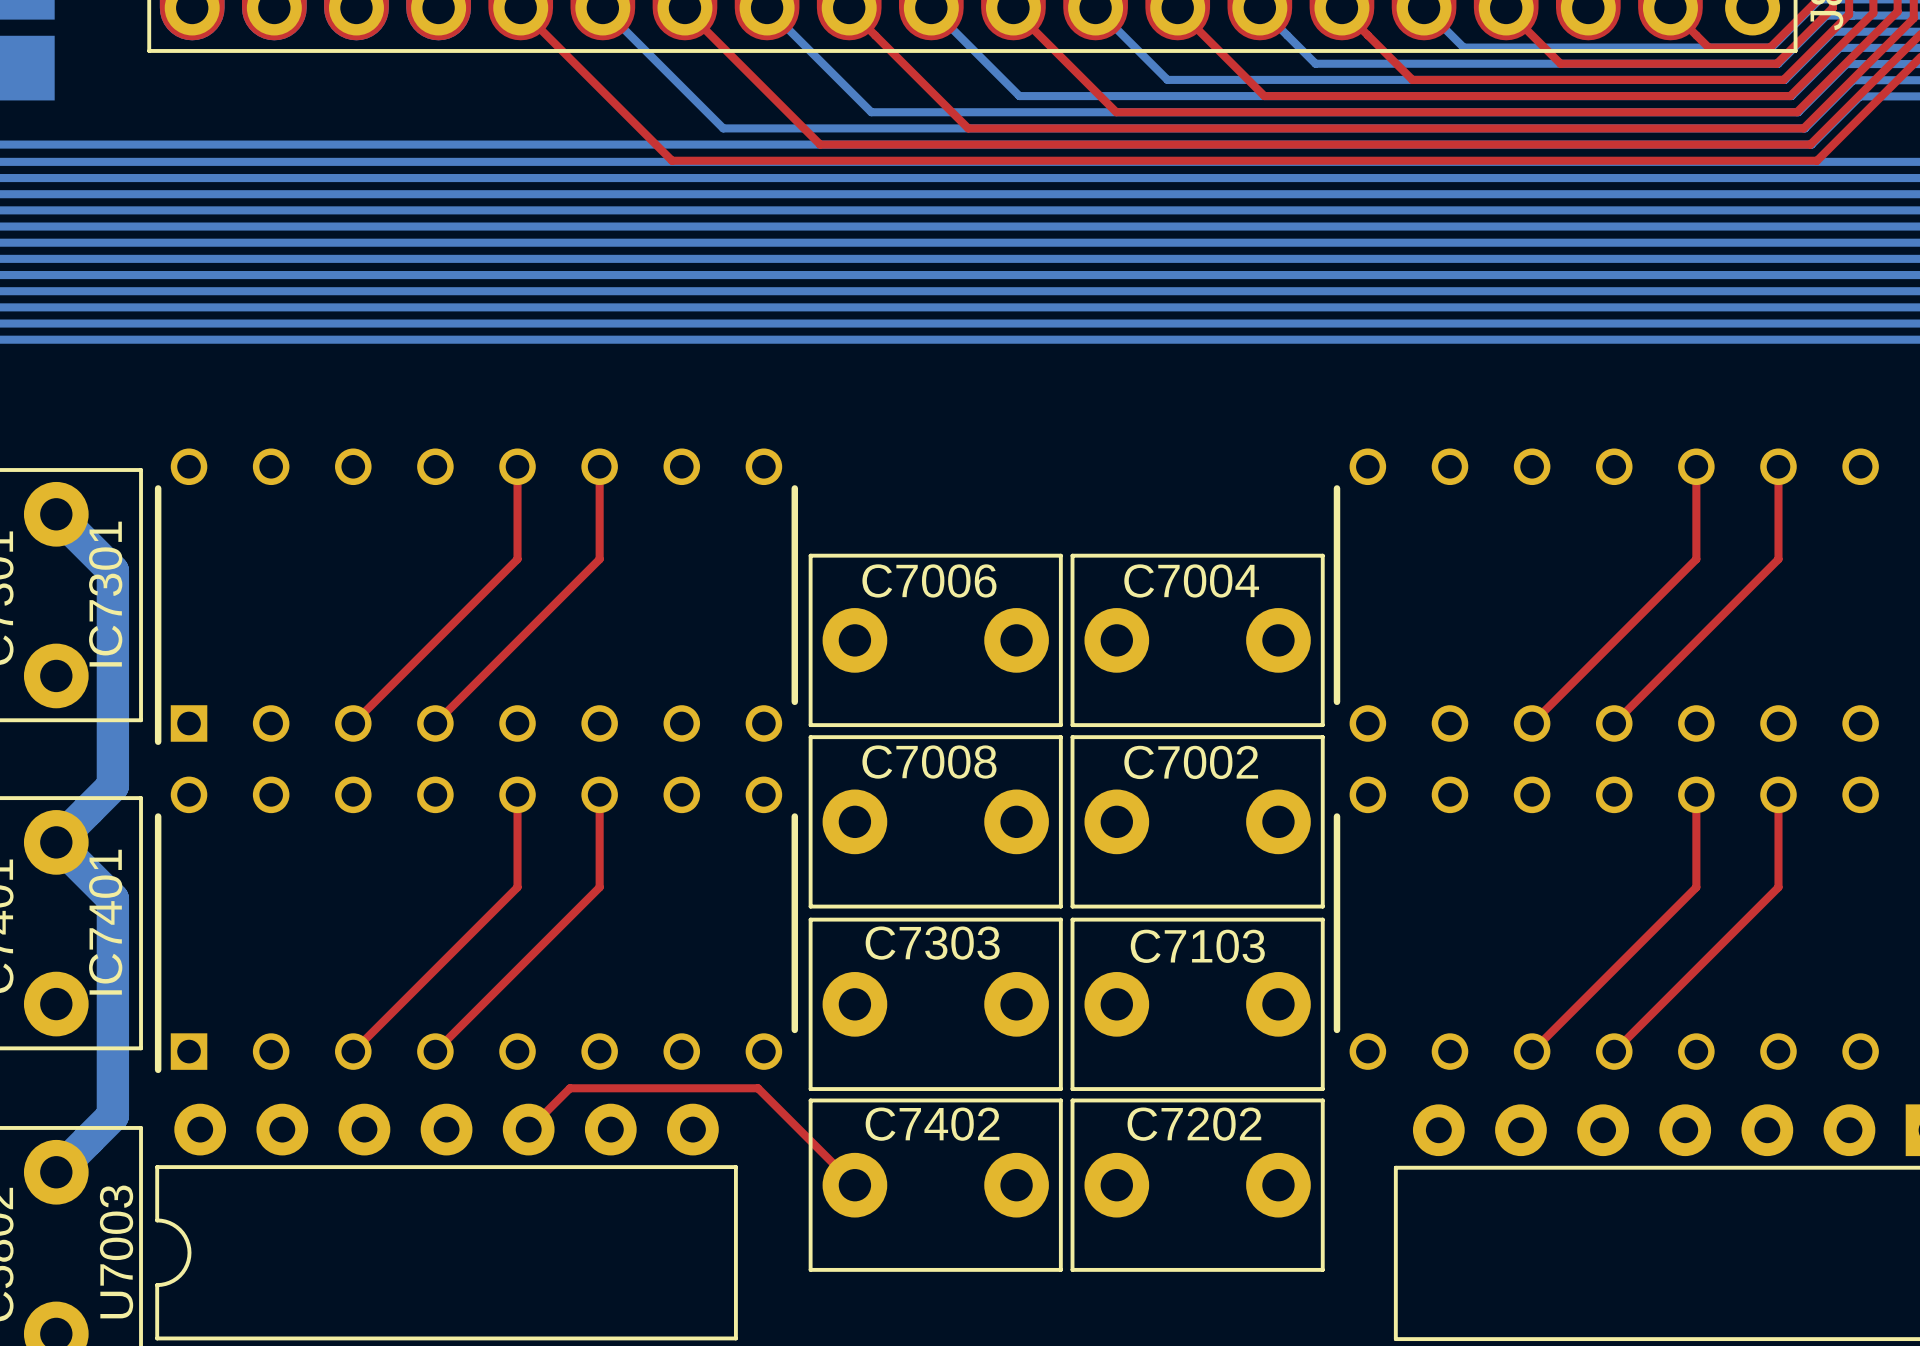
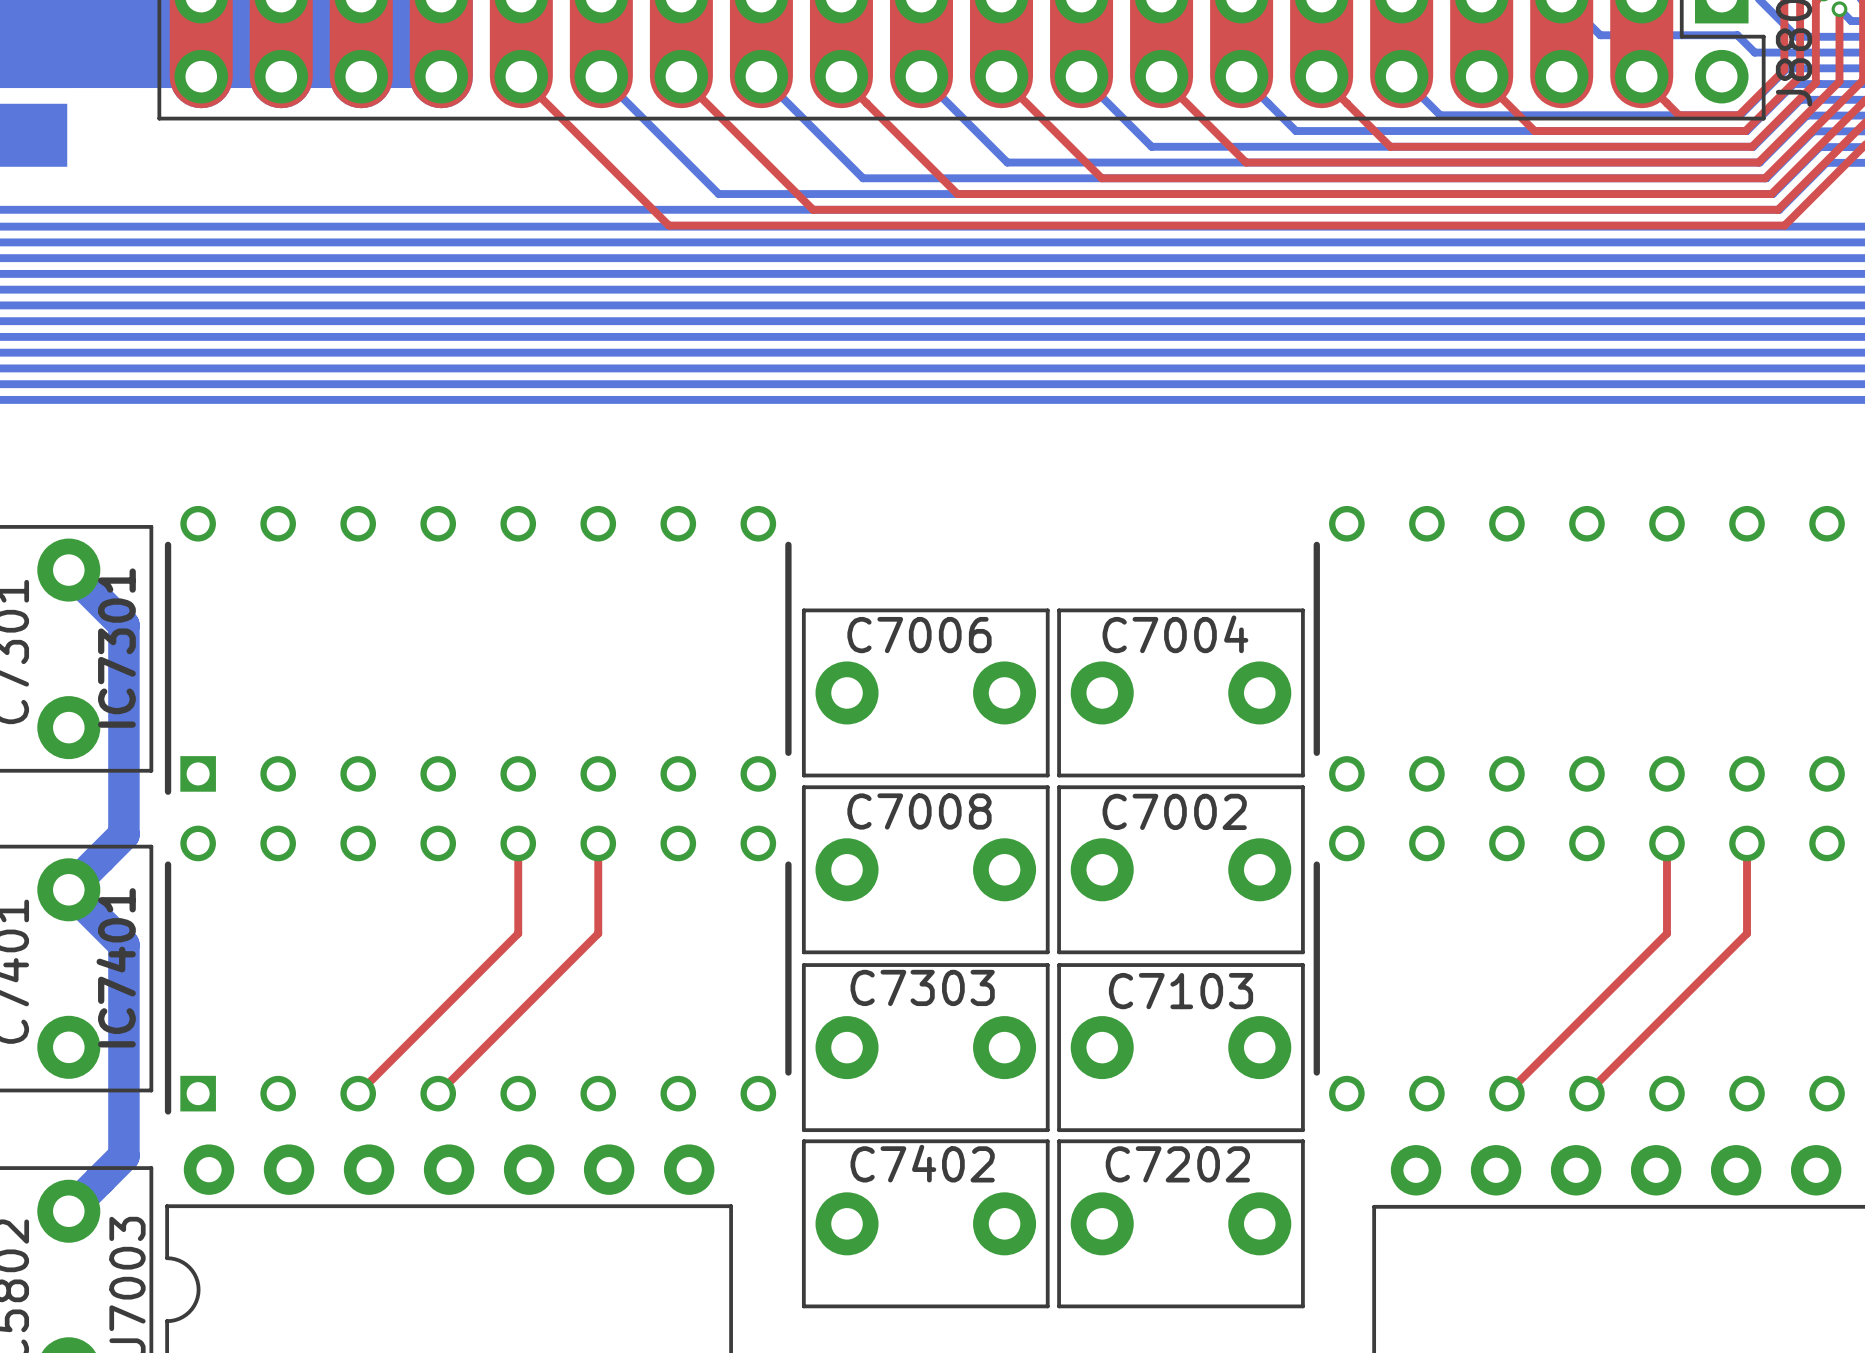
top track: (517, 466) (517, 559) (353, 723) -> none
top track: (599, 466) (599, 559) (435, 723) -> none
top track: (1696, 466) (1696, 559) (1532, 723) -> none
top track: (1778, 466) (1778, 559) (1614, 723) -> none
top track: (528, 1129) (569, 1088) (758, 1088) (854, 1185) -> none

